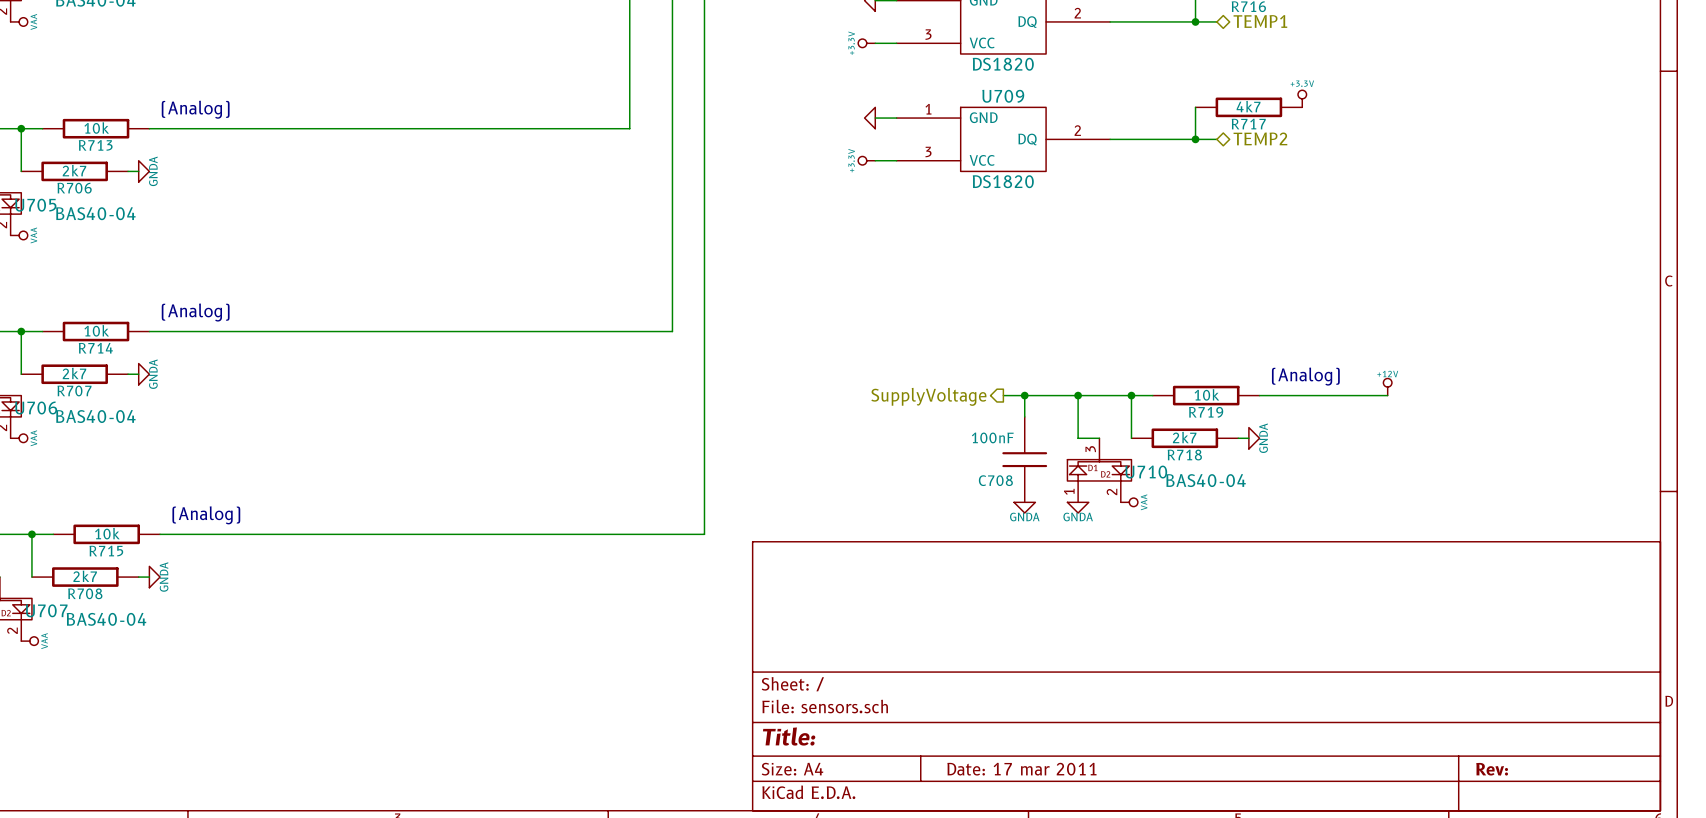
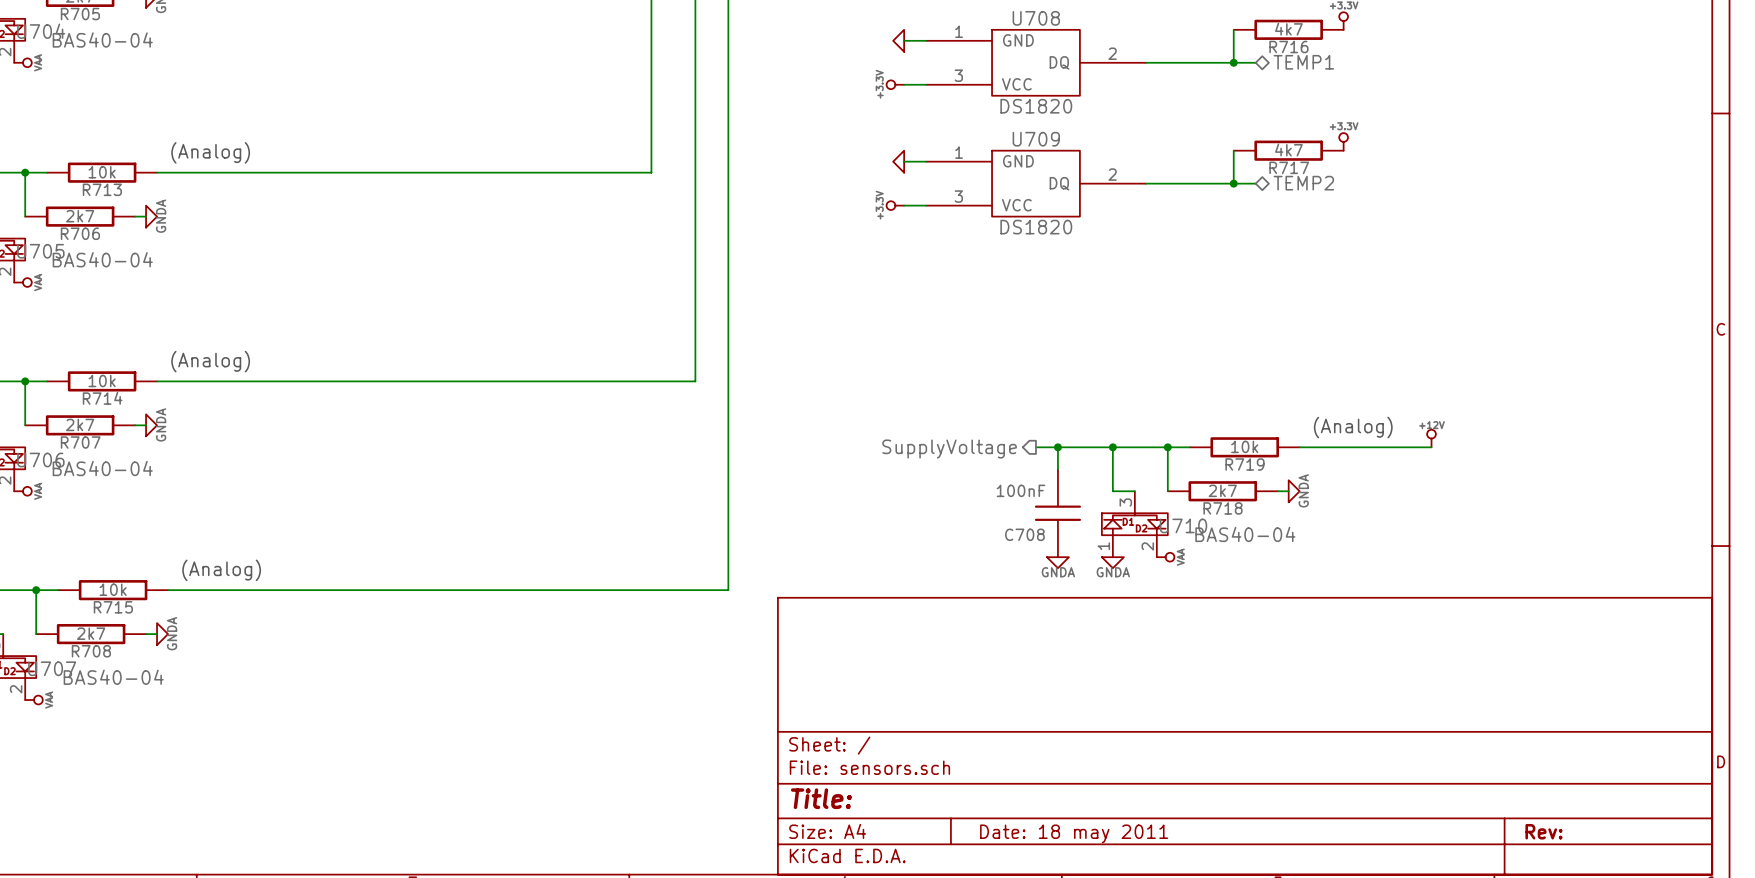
title block: Date: 17 mar 2011 (1021, 769) -> Date: 18 may 2011 (1074, 833)

